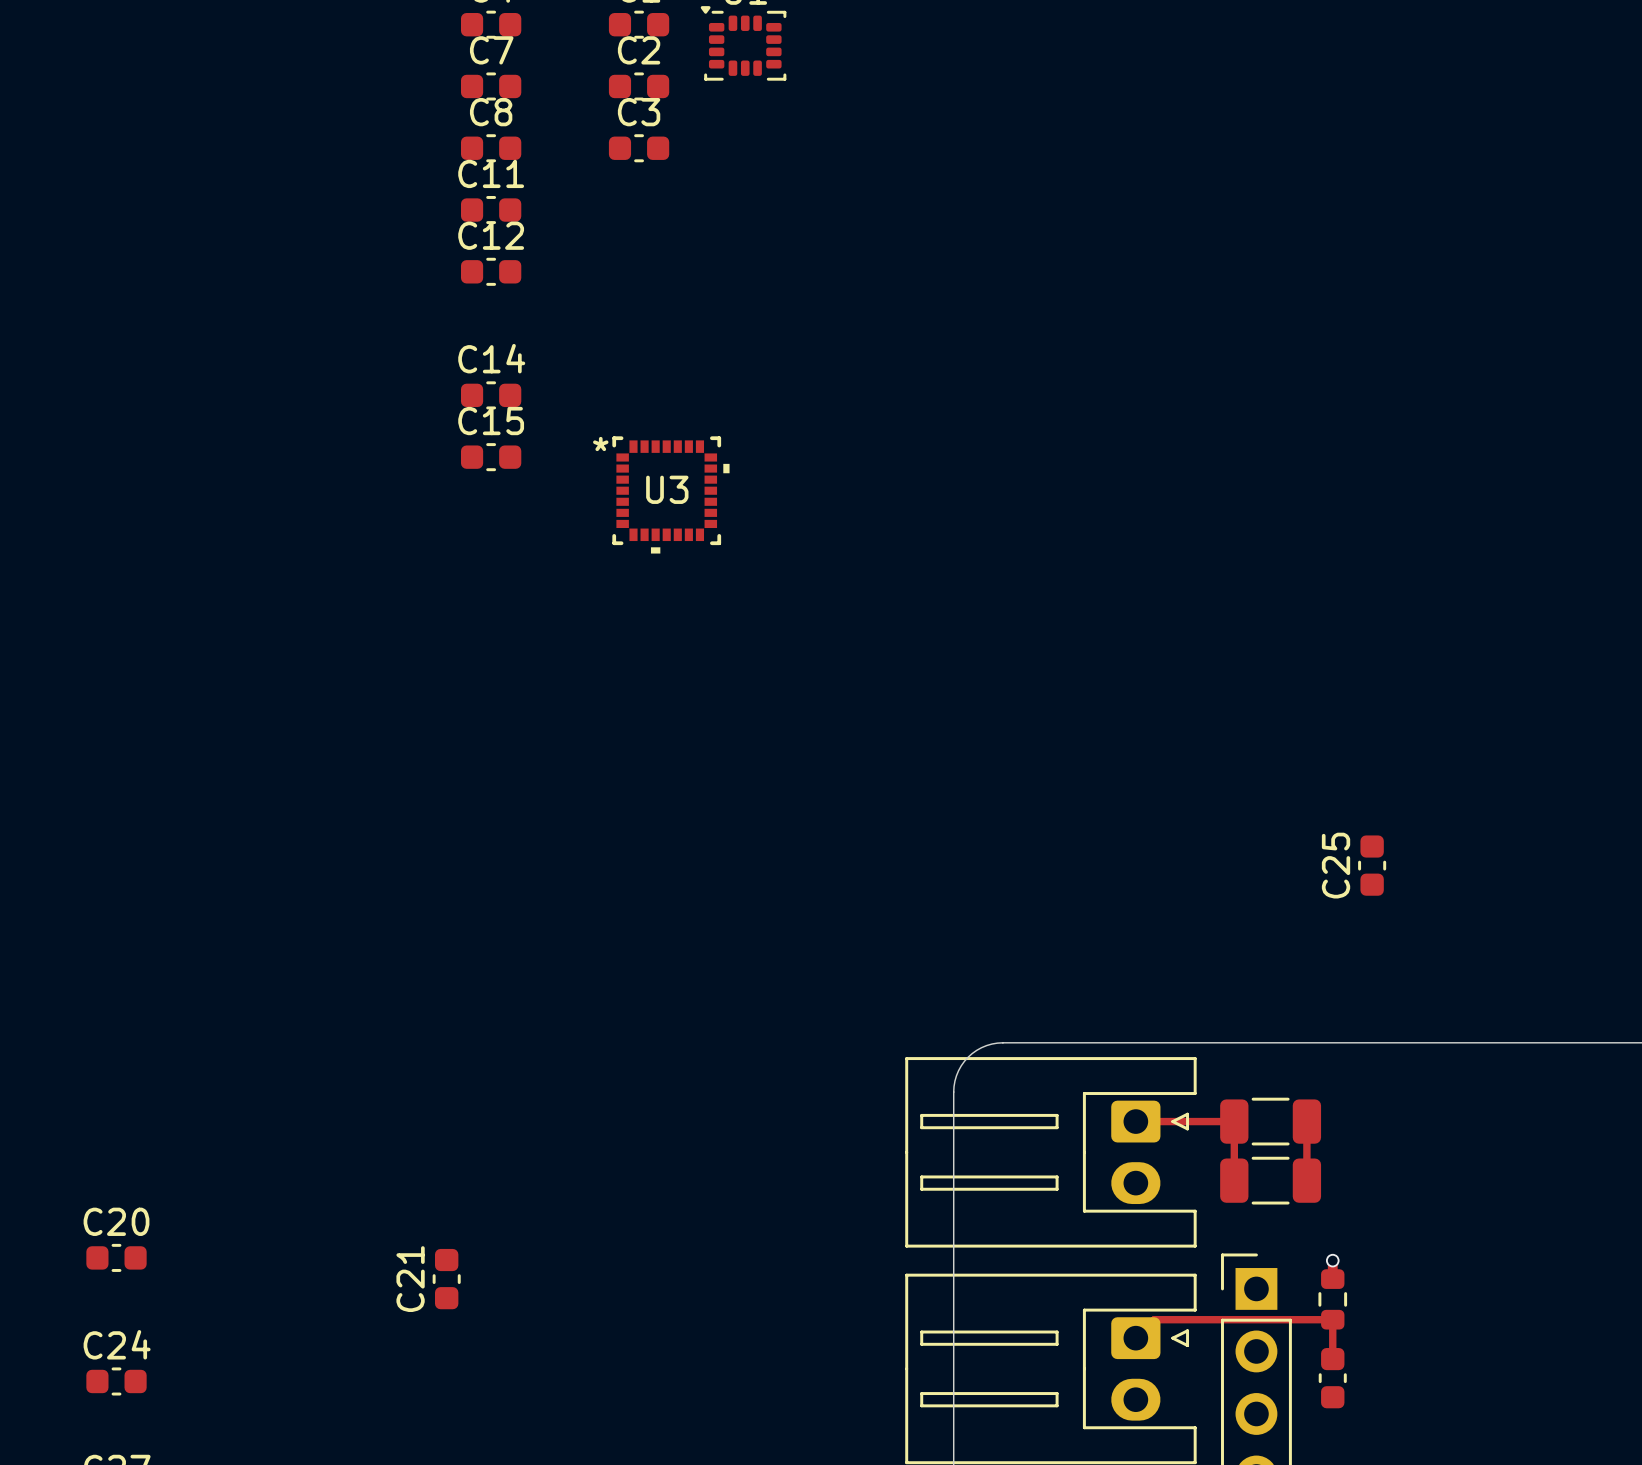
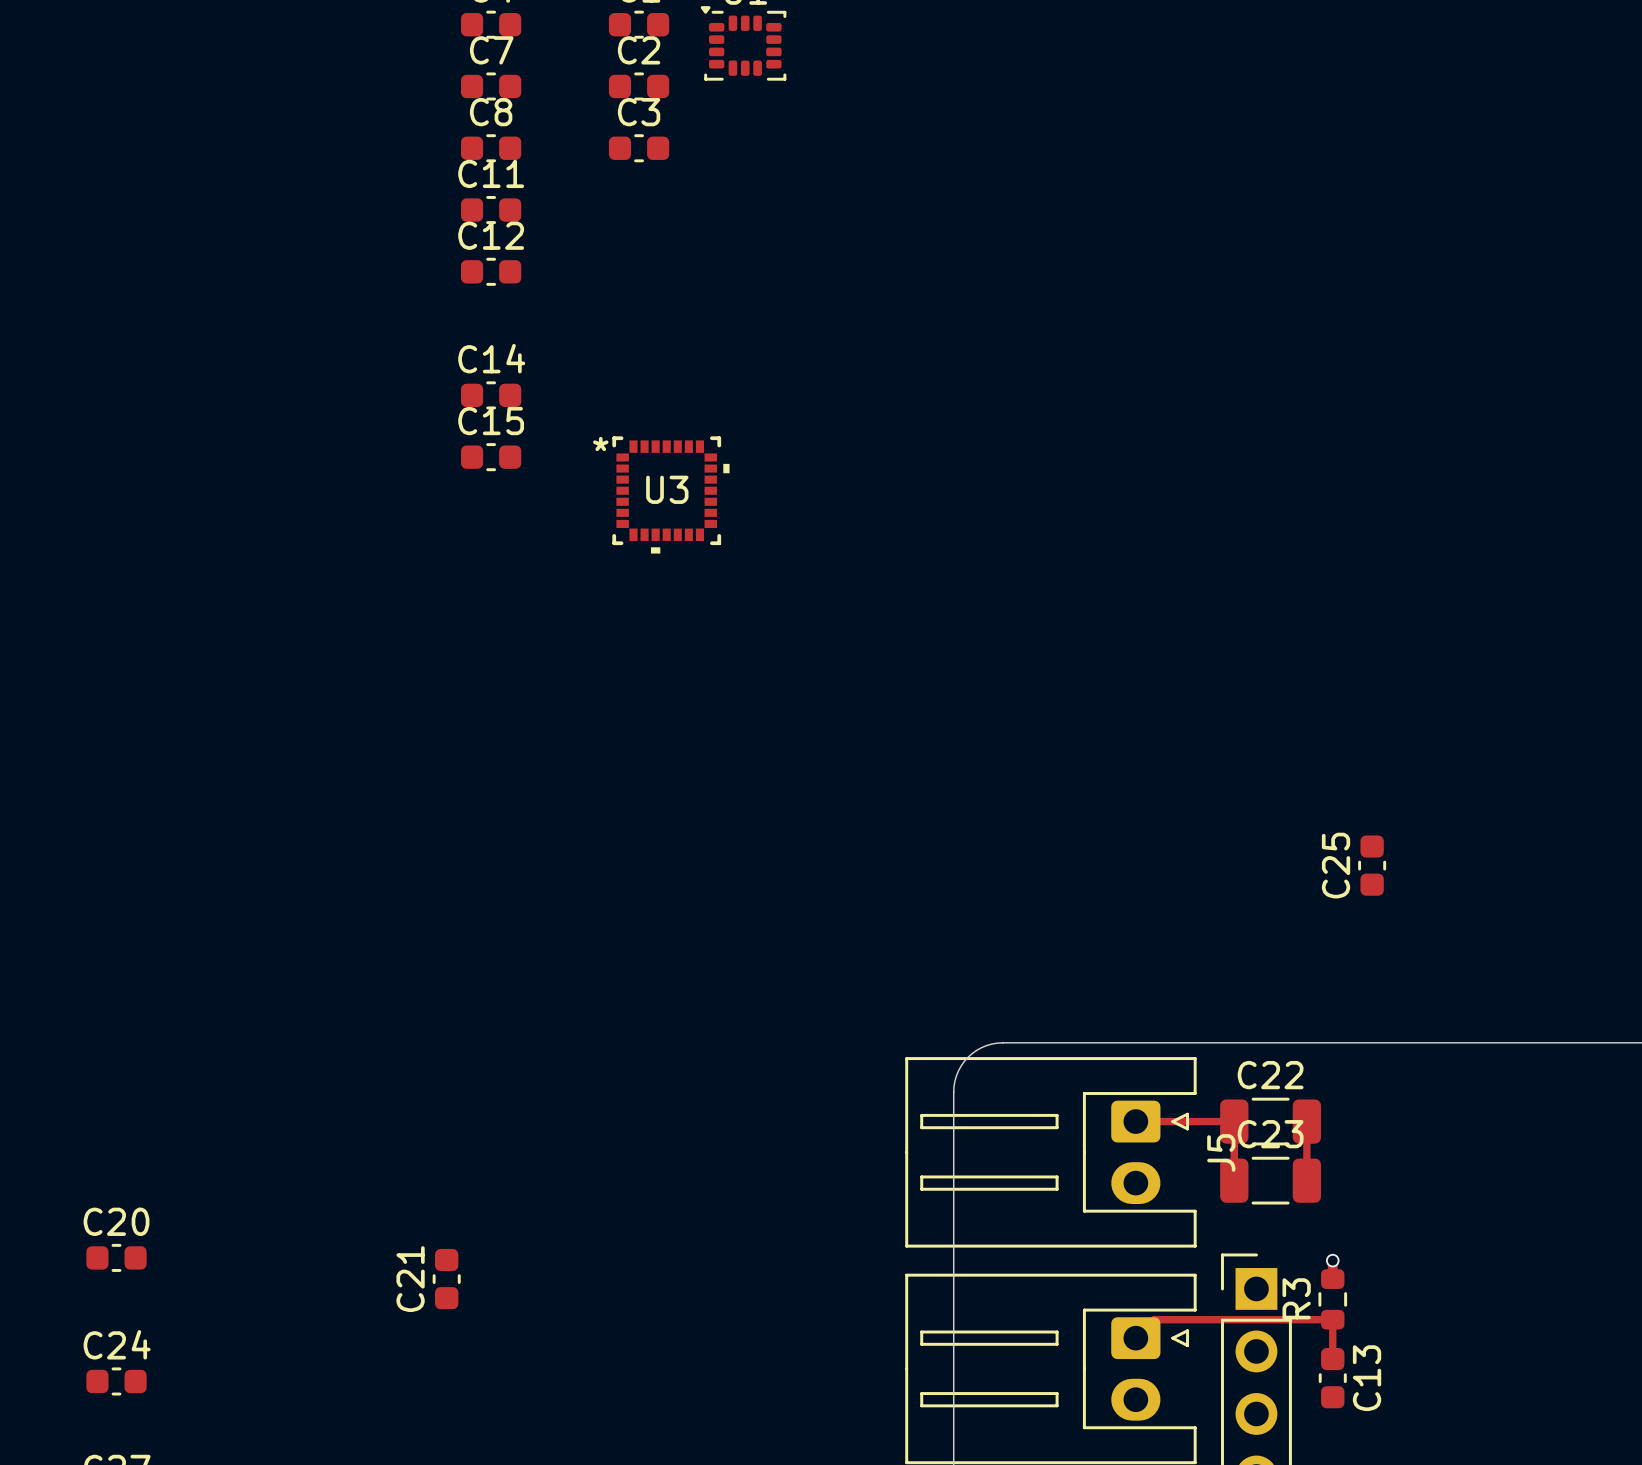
C22 name: none -> C22 (1270, 1075)
C23 name: none -> C23 (1270, 1134)
J5 name: none -> J5 (1221, 1152)
R3 name: none -> R3 (1296, 1298)
C13 name: none -> C13 (1367, 1378)

